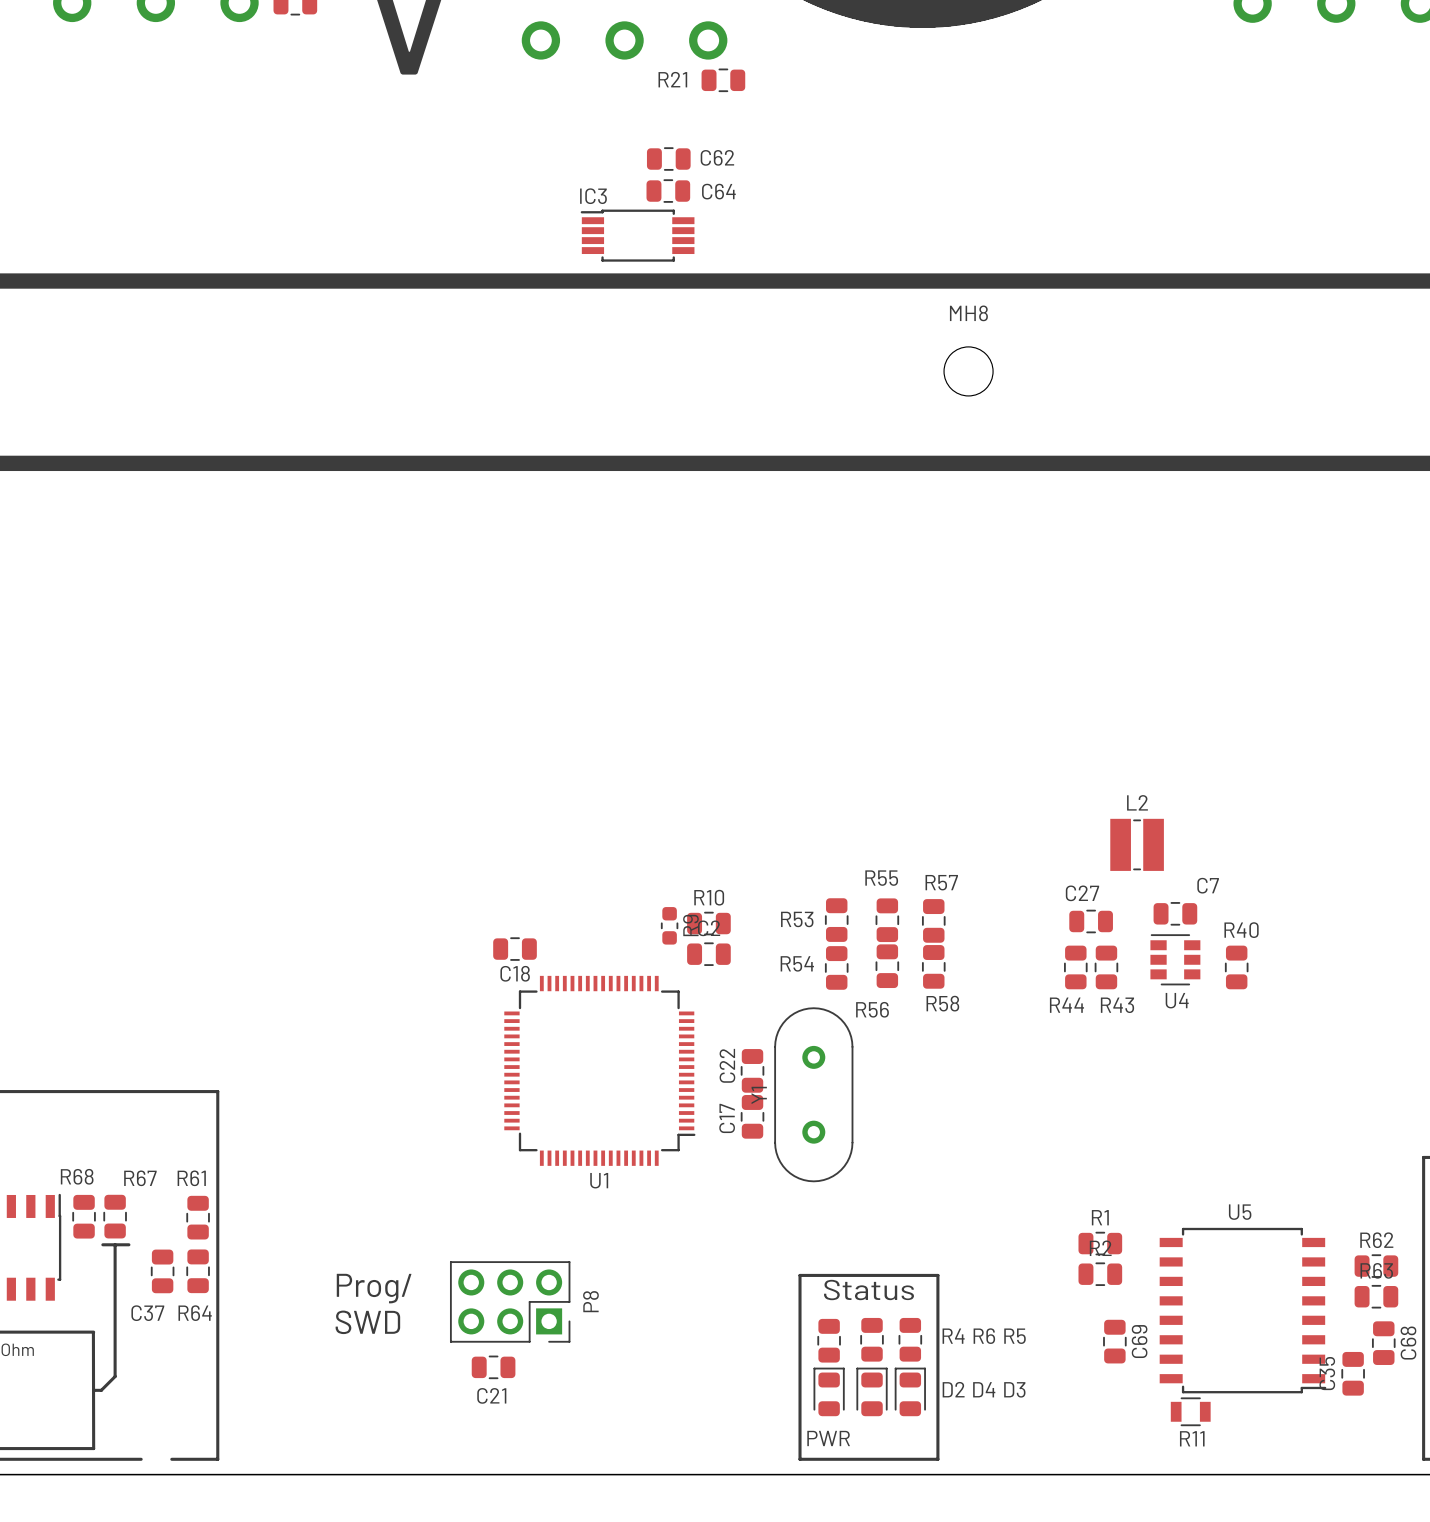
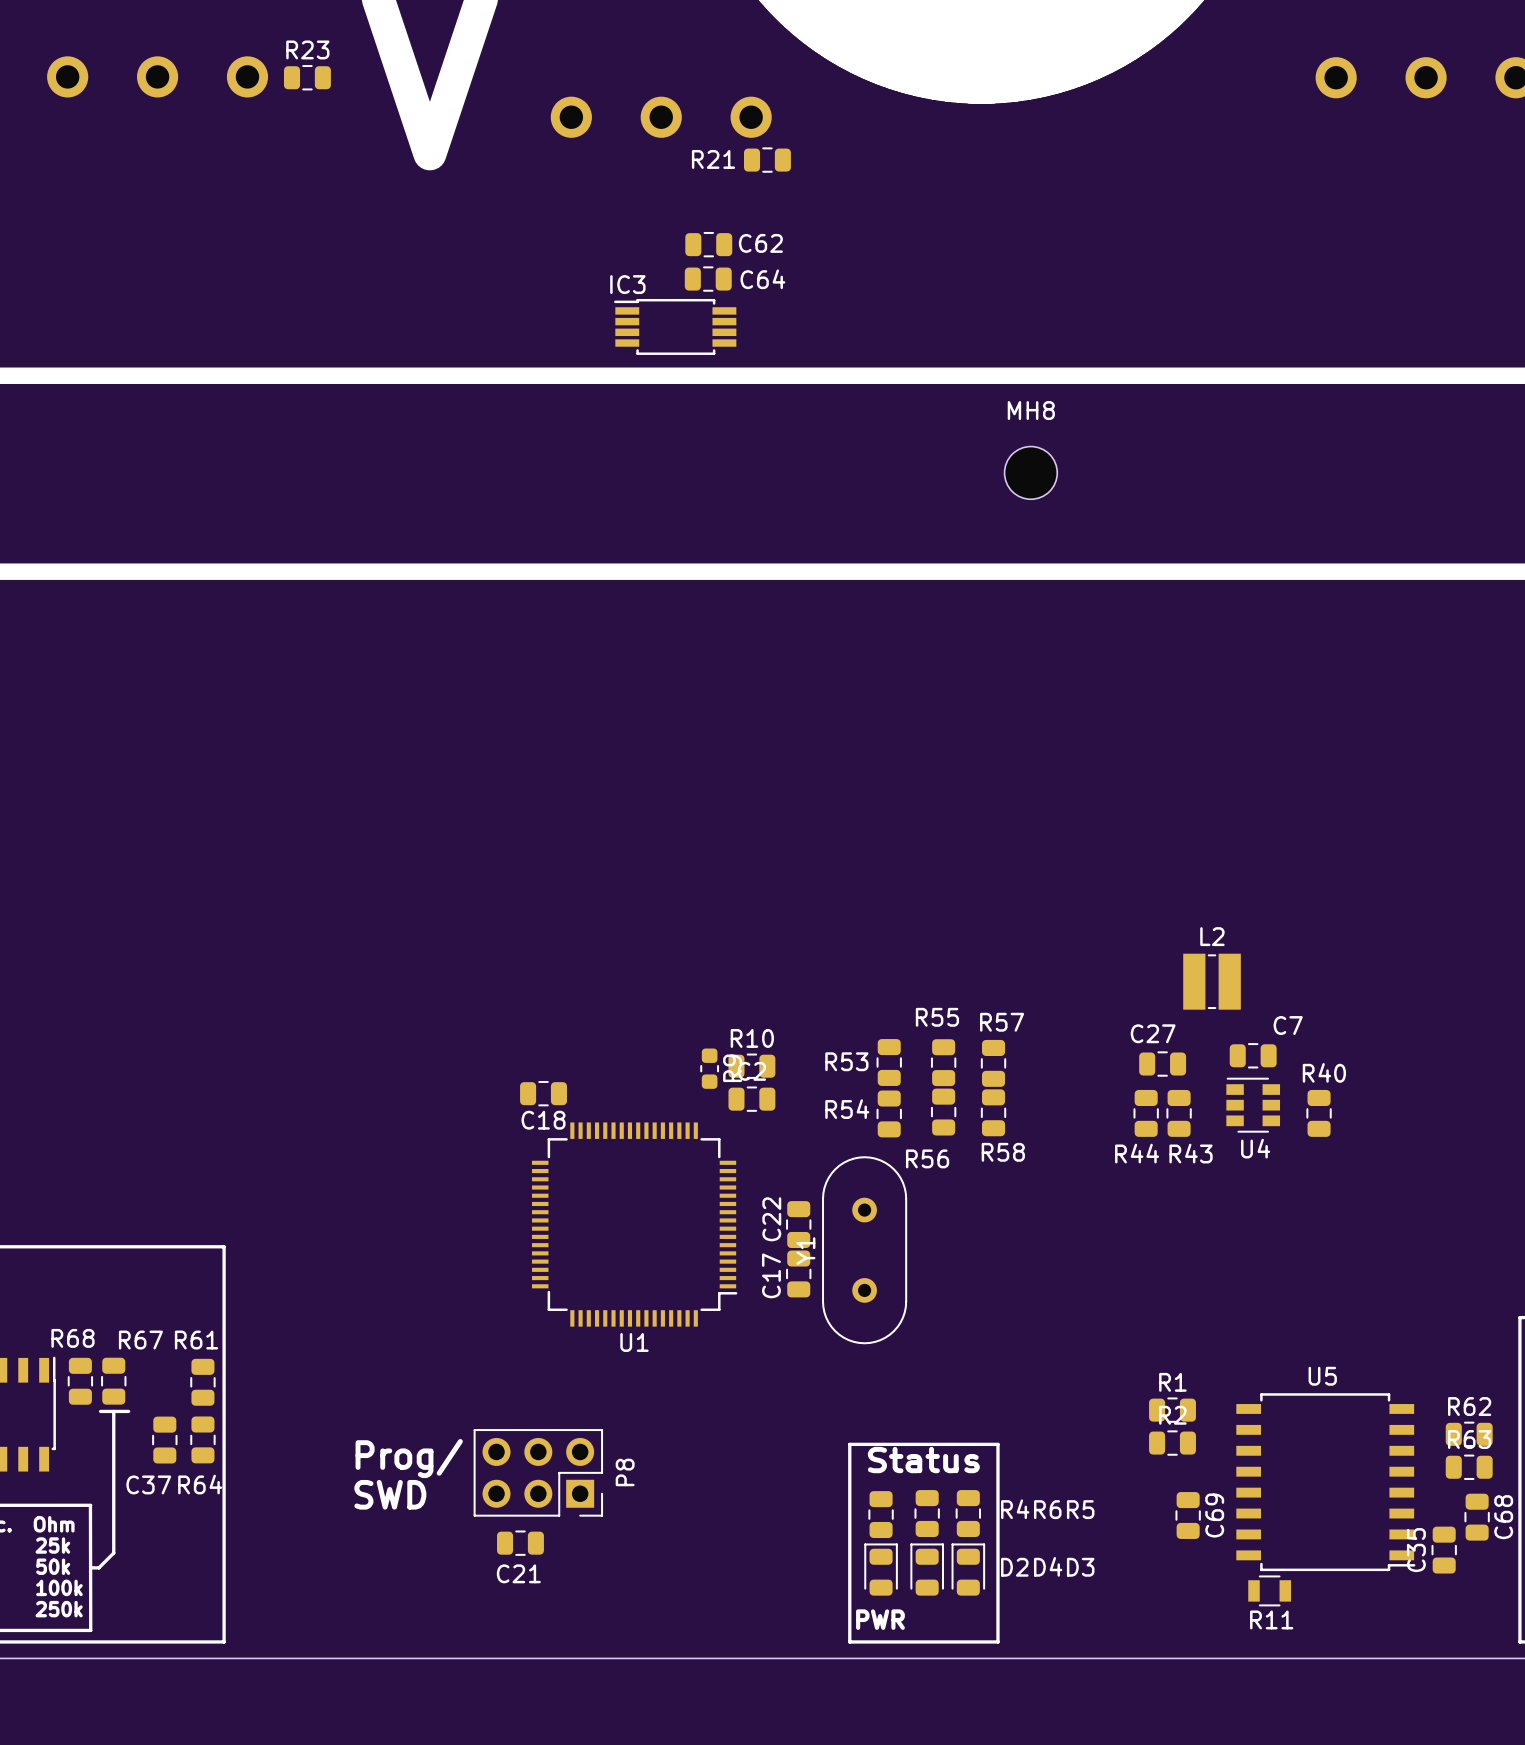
line: none -> (141, 1641) (174, 1641)

